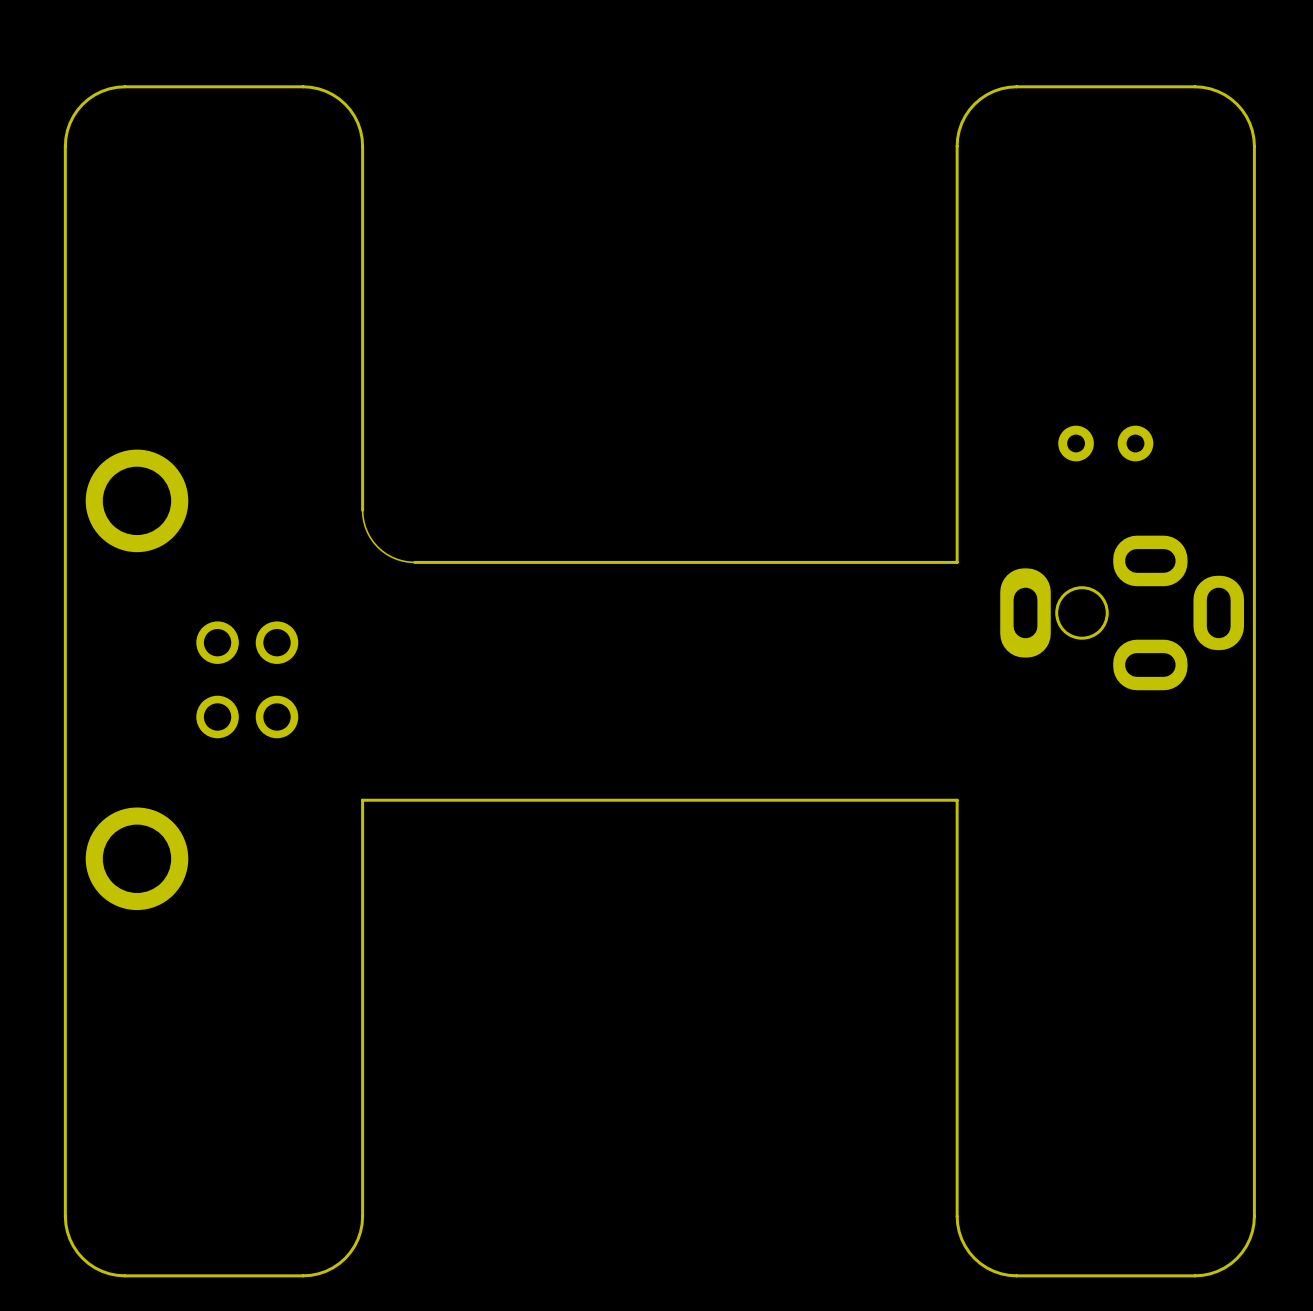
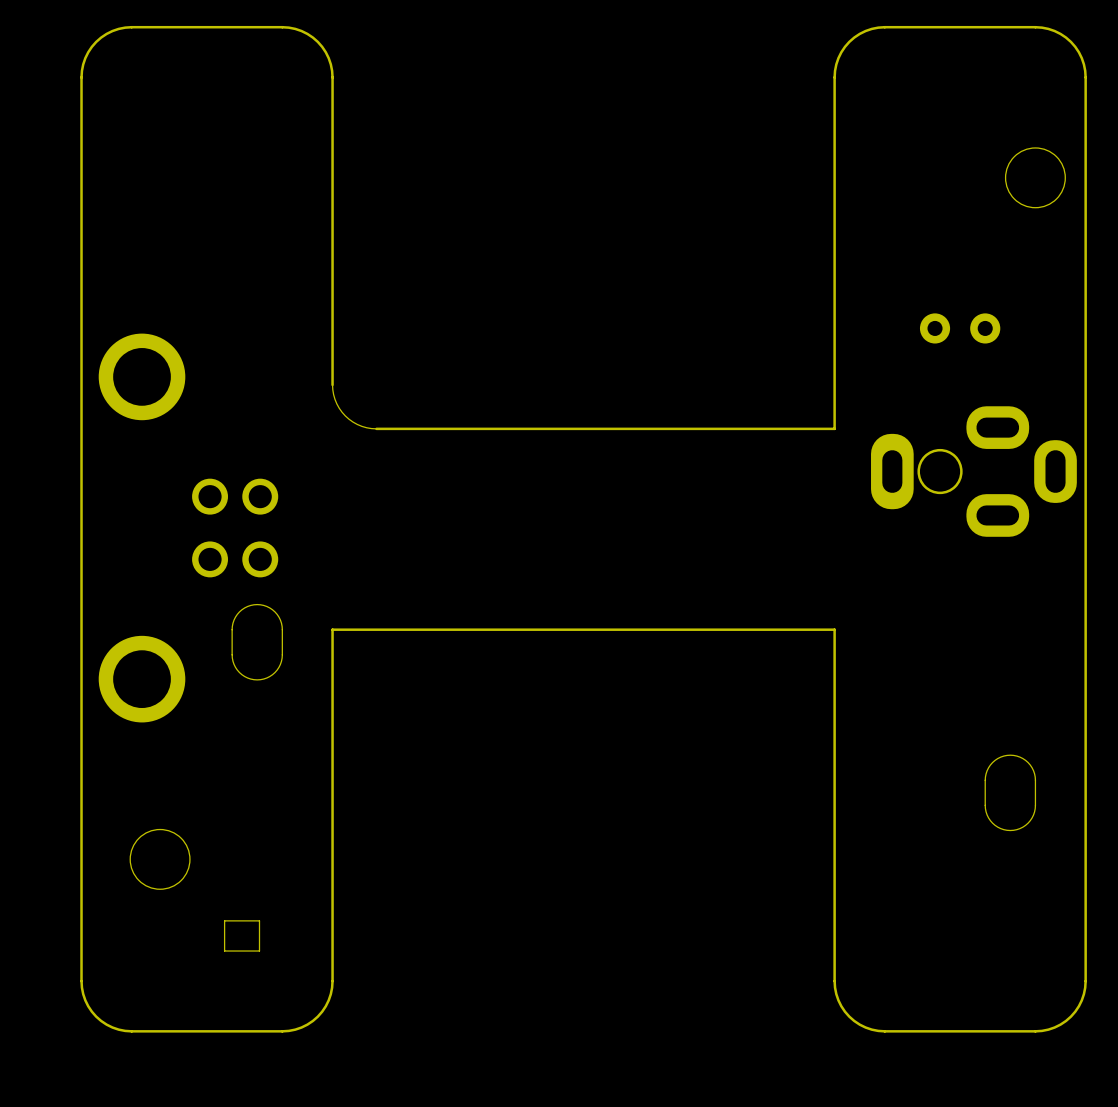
round board edge: none -> [1004, 147, 1066, 209]
board edge: none -> (282, 629) (282, 658) (274, 672) (266, 677) (257, 679) (247, 677) (239, 672) (234, 664) (232, 654) (232, 626) (239, 611) (250, 605) (266, 606) (278, 617) (282, 629)
board edge: none -> (1035, 780) (1035, 808) (1028, 823) (1019, 828) (1010, 830) (1000, 828) (992, 823) (987, 815) (985, 805) (985, 777) (992, 762) (1003, 756) (1019, 757) (1032, 767) (1035, 780)
round board edge: none -> [129, 828, 191, 890]
board edge: none -> (259, 920) (224, 920) (224, 951) (259, 951) (259, 920)

